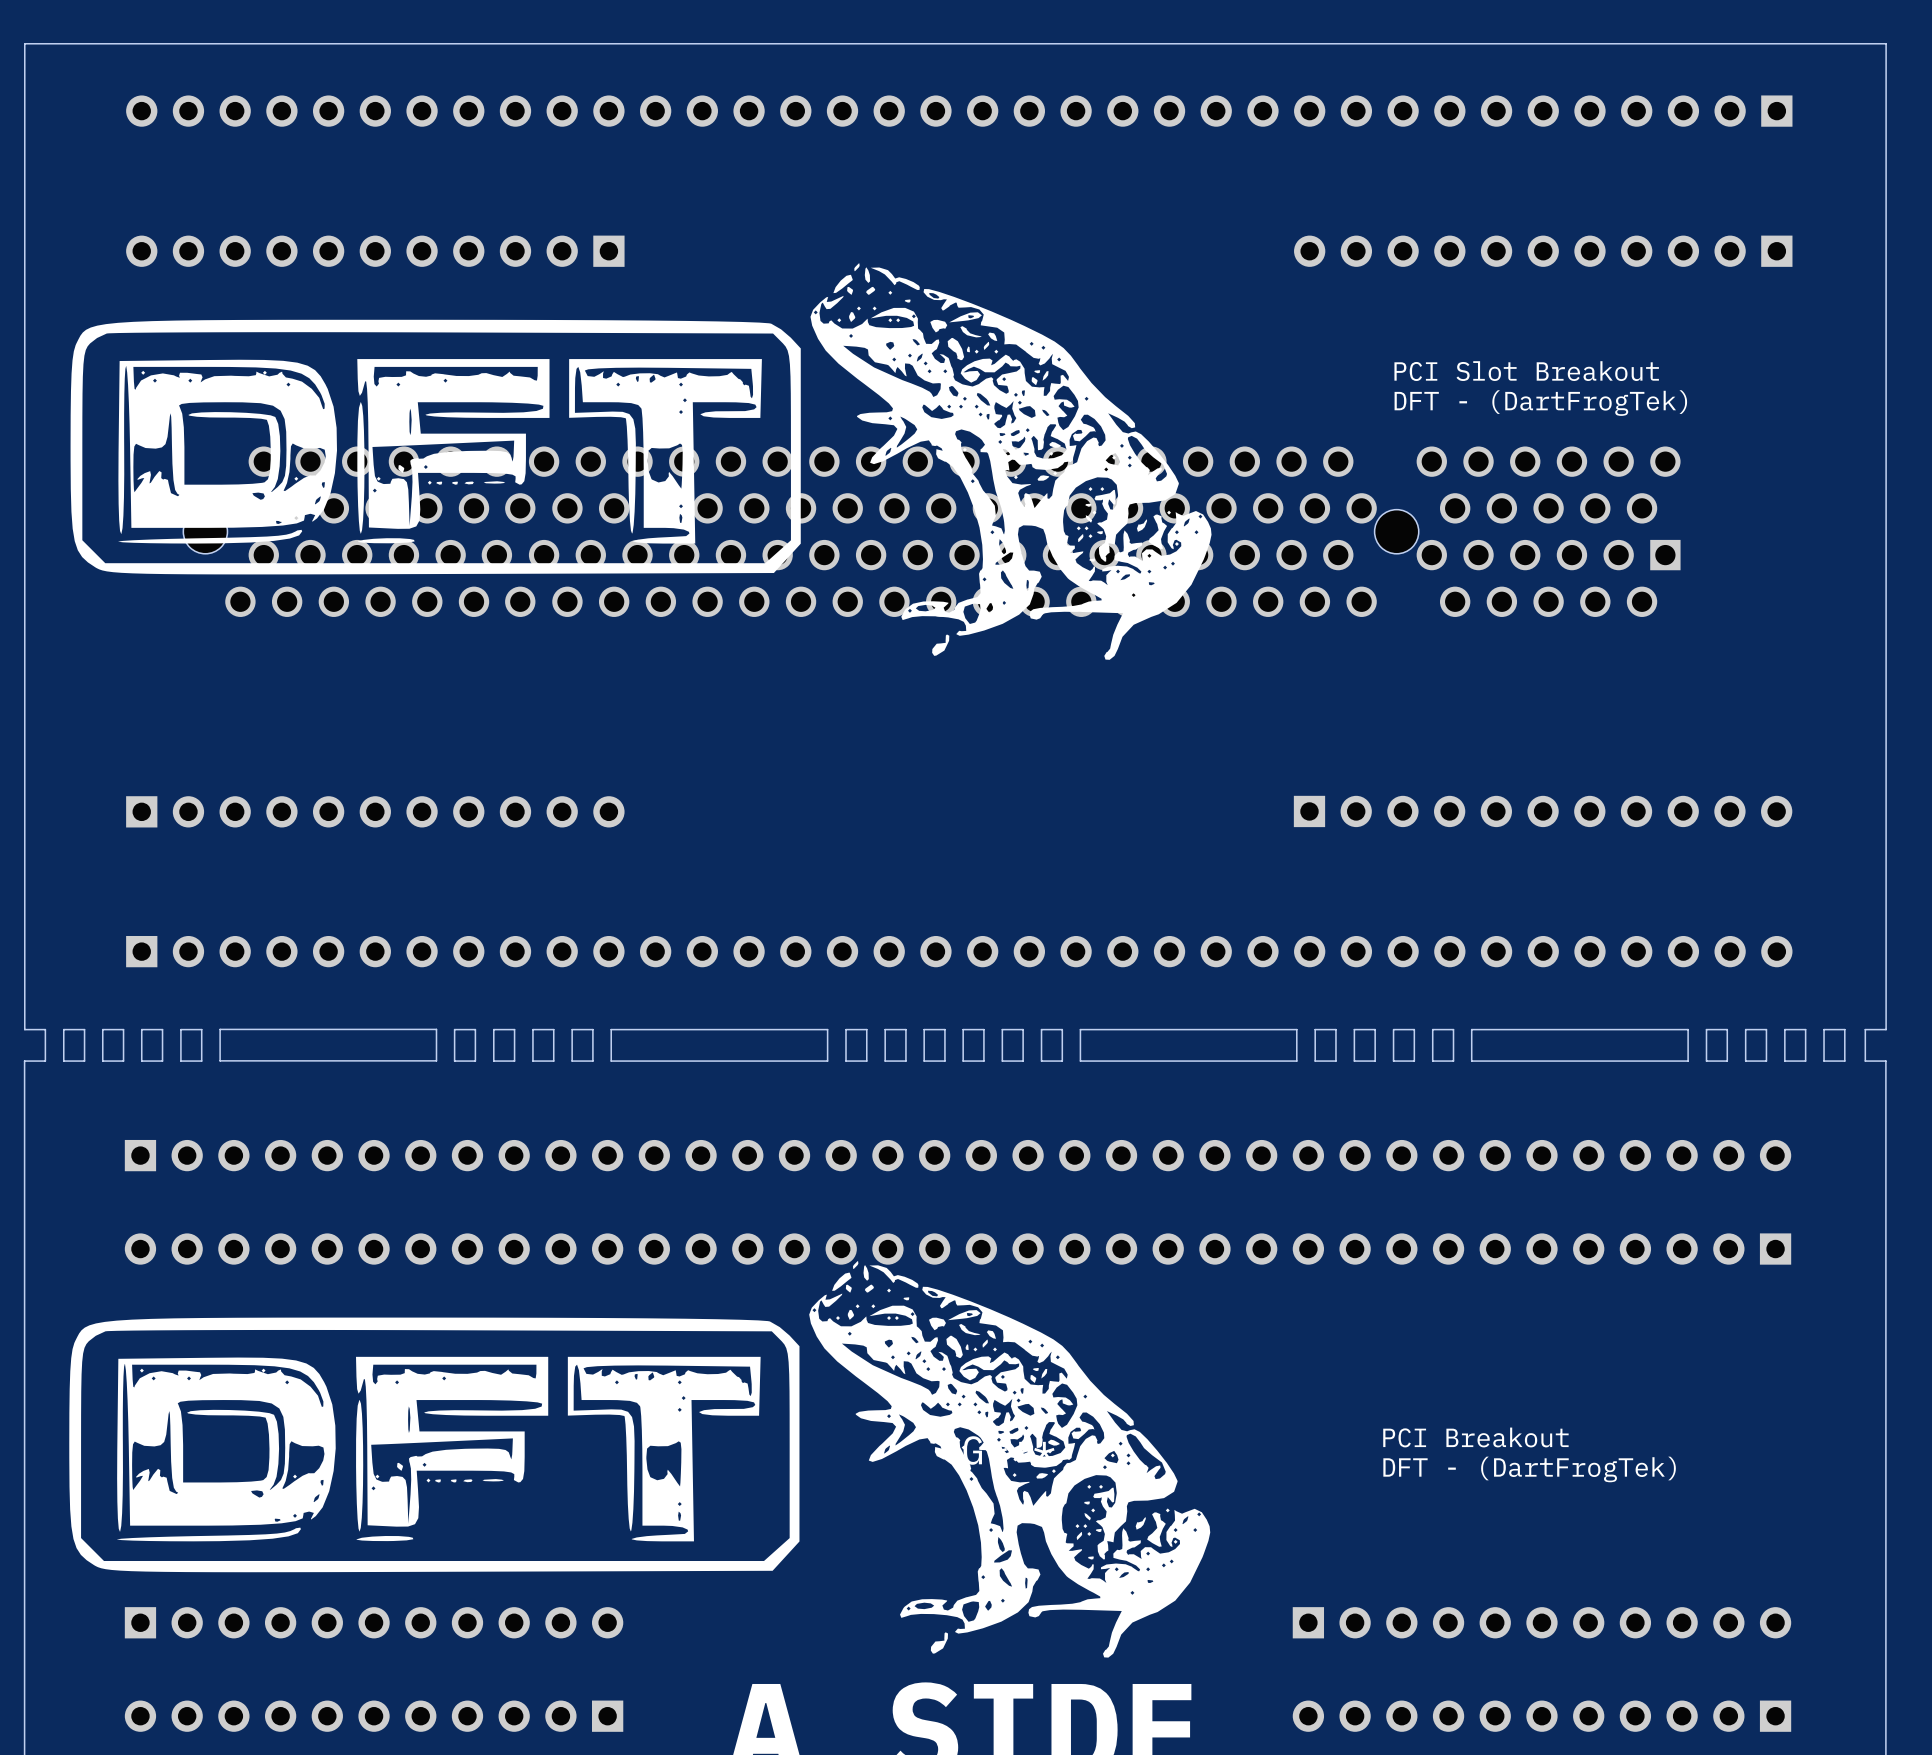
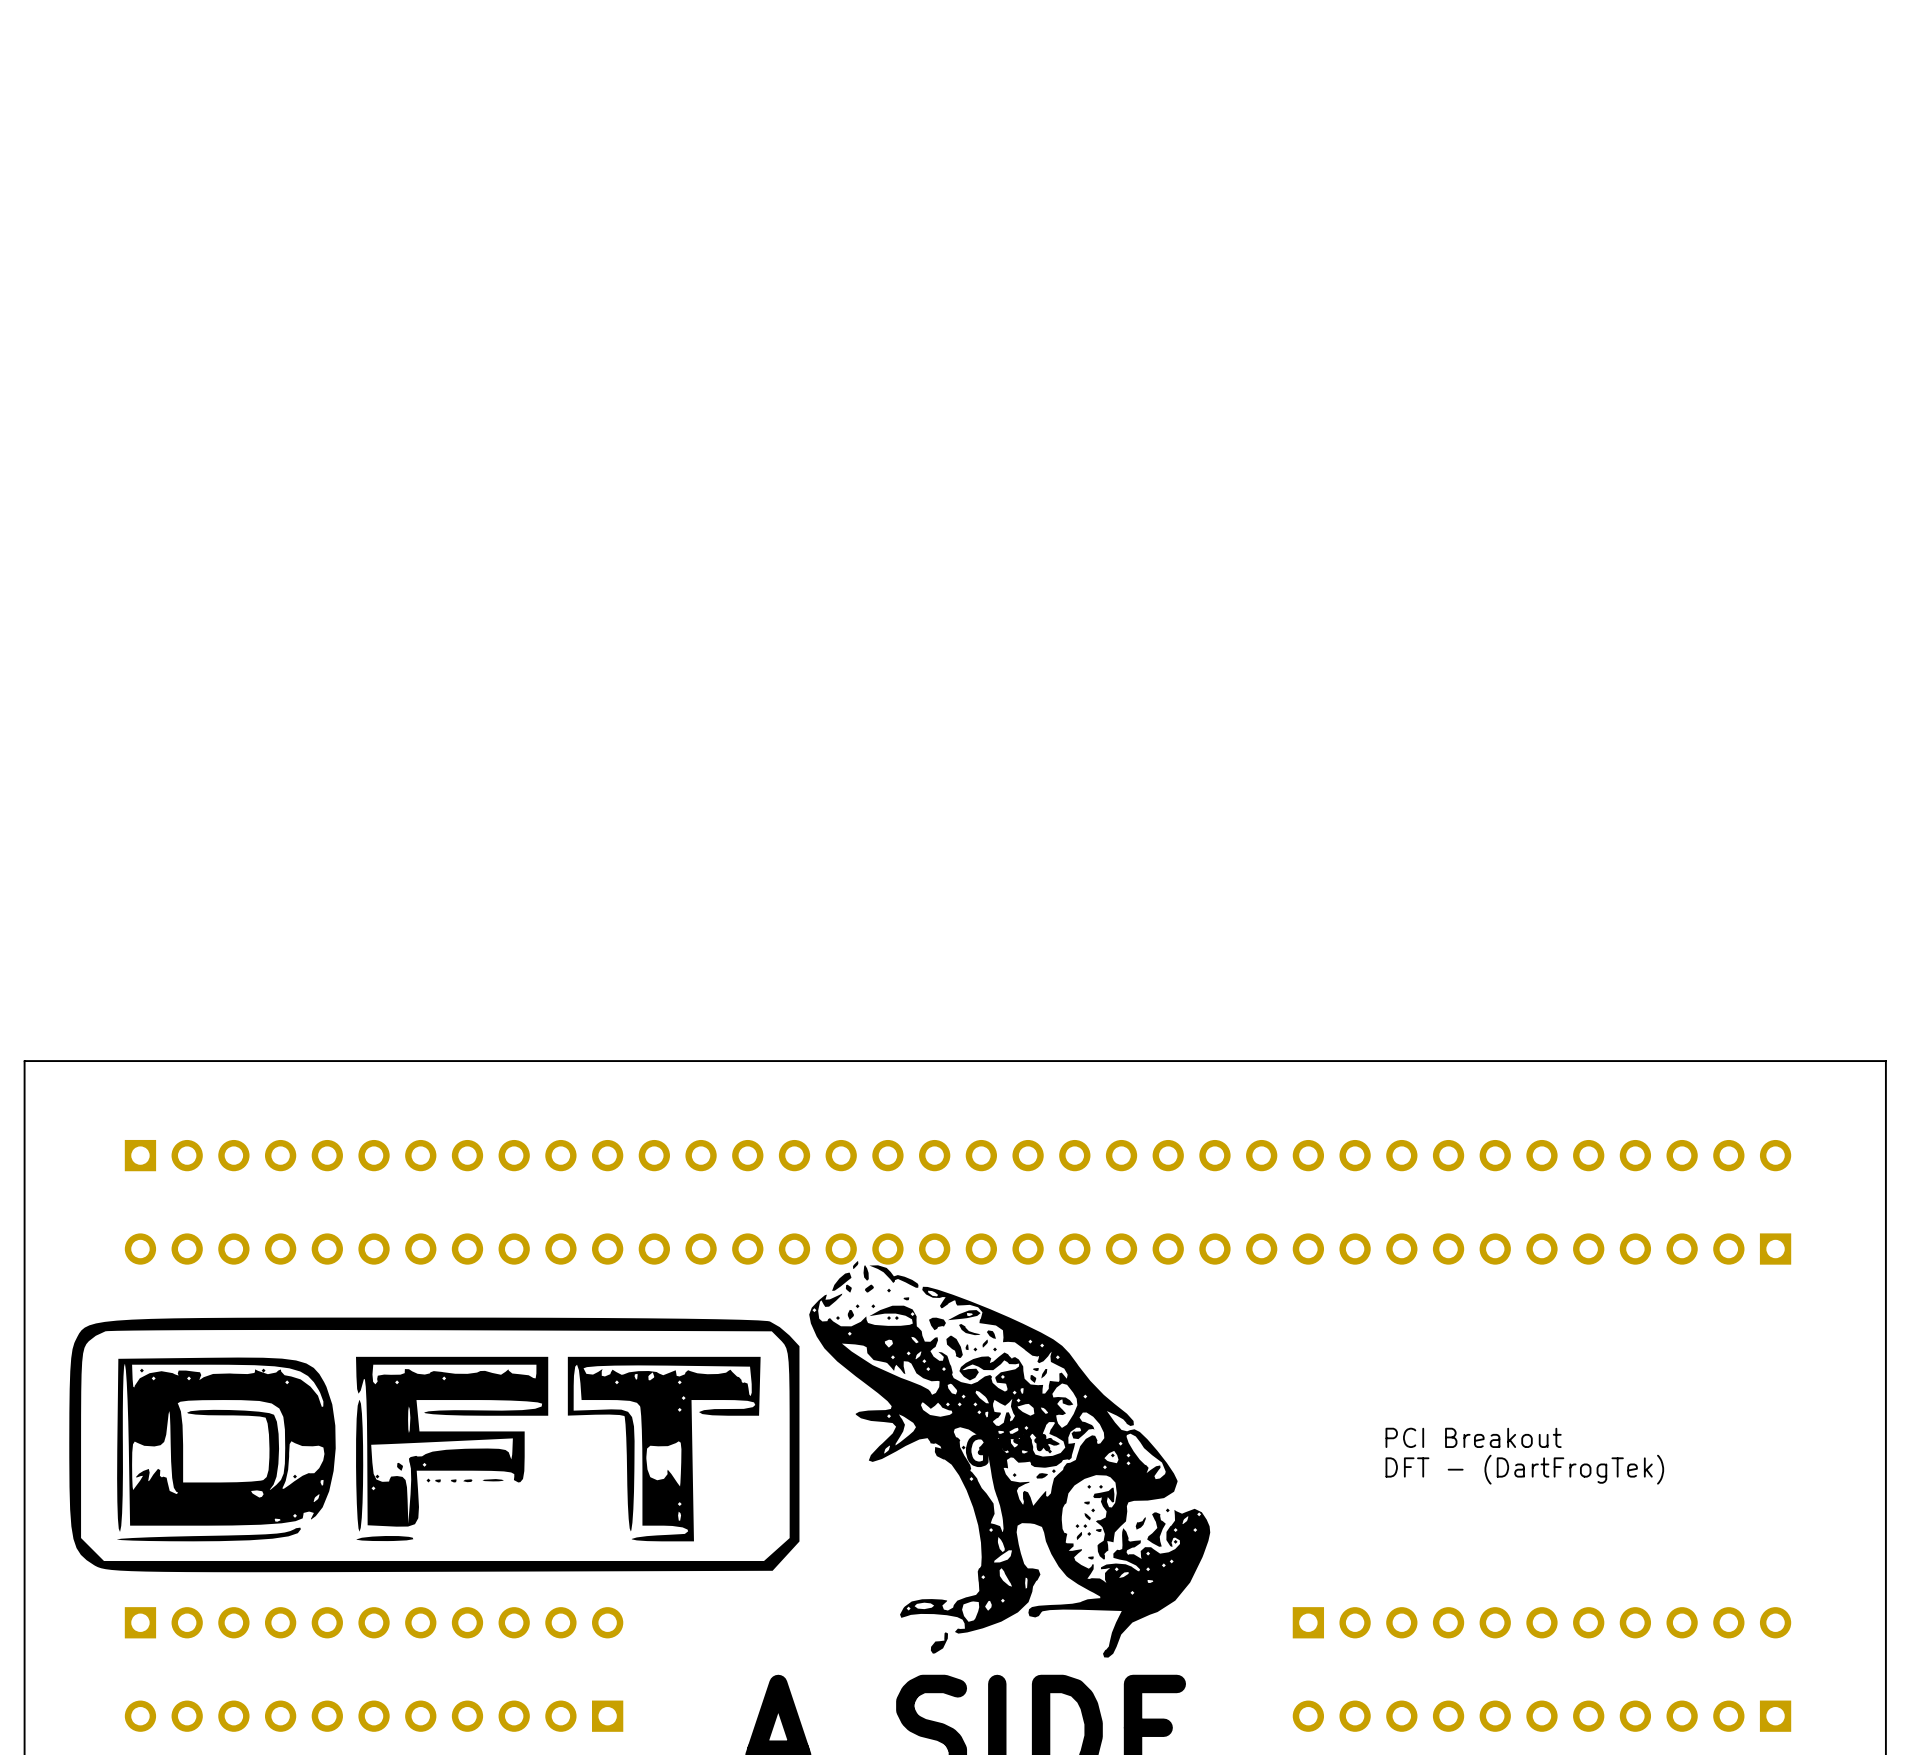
part: (959, 111) -> none
part: (375, 251) -> none
part: (1543, 251) -> none
drawing: [70, 263, 1212, 660] -> none
text: PCI Slot Breakout (1526, 371) -> none
text: DFT - (DartFrogTek) (1540, 403) -> none
part: (931, 531) -> none
part: (375, 811) -> none
part: (1543, 811) -> none
part: (959, 951) -> none
board edge: (436, 1029) (436, 1060) (220, 1060) (220, 1029) (436, 1029) -> none
board edge: (572, 1029) (572, 1061) -> (553, 1061) (572, 1061)
board edge: (572, 1029) (592, 1029) (592, 1061) -> (611, 1061) (592, 1061)
board edge: (846, 1029) (846, 1061) -> (827, 1061) (846, 1061)
board edge: (846, 1029) (866, 1029) (866, 1061) -> none
board edge: (1393, 1029) (1393, 1061) -> (1375, 1061) (1393, 1061)
board edge: (1393, 1029) (1414, 1029) (1414, 1061) -> (1432, 1061) (1414, 1061)
board edge: none -> (63, 1061) (45, 1061)
board edge: (84, 1061) (84, 1029) (63, 1029) (63, 1061) -> (84, 1061) (102, 1061)
board edge: (123, 1061) (123, 1029) (102, 1029) (102, 1061) -> (123, 1061) (141, 1061)
board edge: (162, 1061) (162, 1029) (141, 1029) (141, 1061) -> none
board edge: (201, 1061) (201, 1029) (180, 1029) (180, 1061) -> (162, 1061) (180, 1061)
board edge: (475, 1061) (475, 1029) (454, 1029) (454, 1061) -> (201, 1061) (454, 1061)
board edge: (514, 1061) (514, 1029) (493, 1029) (493, 1061) -> (475, 1061) (493, 1061)
board edge: (553, 1061) (553, 1029) (532, 1029) (532, 1061) -> (514, 1061) (532, 1061)
board edge: (827, 1061) (827, 1029) (611, 1029) (611, 1061) -> none
board edge: (905, 1061) (905, 1029) (885, 1029) (885, 1061) -> (866, 1061) (885, 1061)
board edge: (944, 1061) (944, 1029) (924, 1029) (924, 1061) -> (905, 1061) (924, 1061)
board edge: (983, 1061) (983, 1029) (963, 1029) (963, 1061) -> (944, 1061) (963, 1061)
board edge: none -> (1002, 1061) (983, 1061)
board edge: (1023, 1061) (1023, 1029) (1002, 1029) (1002, 1061) -> (1023, 1061) (1041, 1061)
board edge: (1062, 1061) (1062, 1029) (1041, 1029) (1041, 1061) -> (1062, 1061) (1080, 1061)
board edge: (1296, 1061) (1296, 1029) (1080, 1029) (1080, 1061) -> none
board edge: (1335, 1061) (1335, 1029) (1315, 1029) (1315, 1061) -> (1296, 1061) (1315, 1061)
board edge: (1375, 1061) (1375, 1029) (1354, 1029) (1354, 1061) -> (1335, 1061) (1354, 1061)
board edge: (1453, 1061) (1453, 1029) (1432, 1029) (1432, 1061) -> (1453, 1061) (1471, 1061)
board edge: (1688, 1061) (1688, 1029) (1471, 1029) (1471, 1061) -> (1688, 1061) (1706, 1061)
board edge: (1727, 1061) (1727, 1029) (1706, 1029) (1706, 1061) -> (1727, 1061) (1745, 1061)
board edge: (1766, 1061) (1766, 1029) (1745, 1029) (1745, 1061) -> (1766, 1061) (1784, 1061)
board edge: (1805, 1061) (1805, 1029) (1784, 1029) (1784, 1061) -> none
board edge: (1844, 1061) (1844, 1029) (1824, 1029) (1824, 1061) -> (1805, 1061) (1824, 1061)
board edge: (1865, 1061) (1865, 1029) (1886, 1029) (1886, 43) (24, 43) (24, 1029) (45, 1029) (45, 1061) -> (1865, 1061) (1844, 1061)

